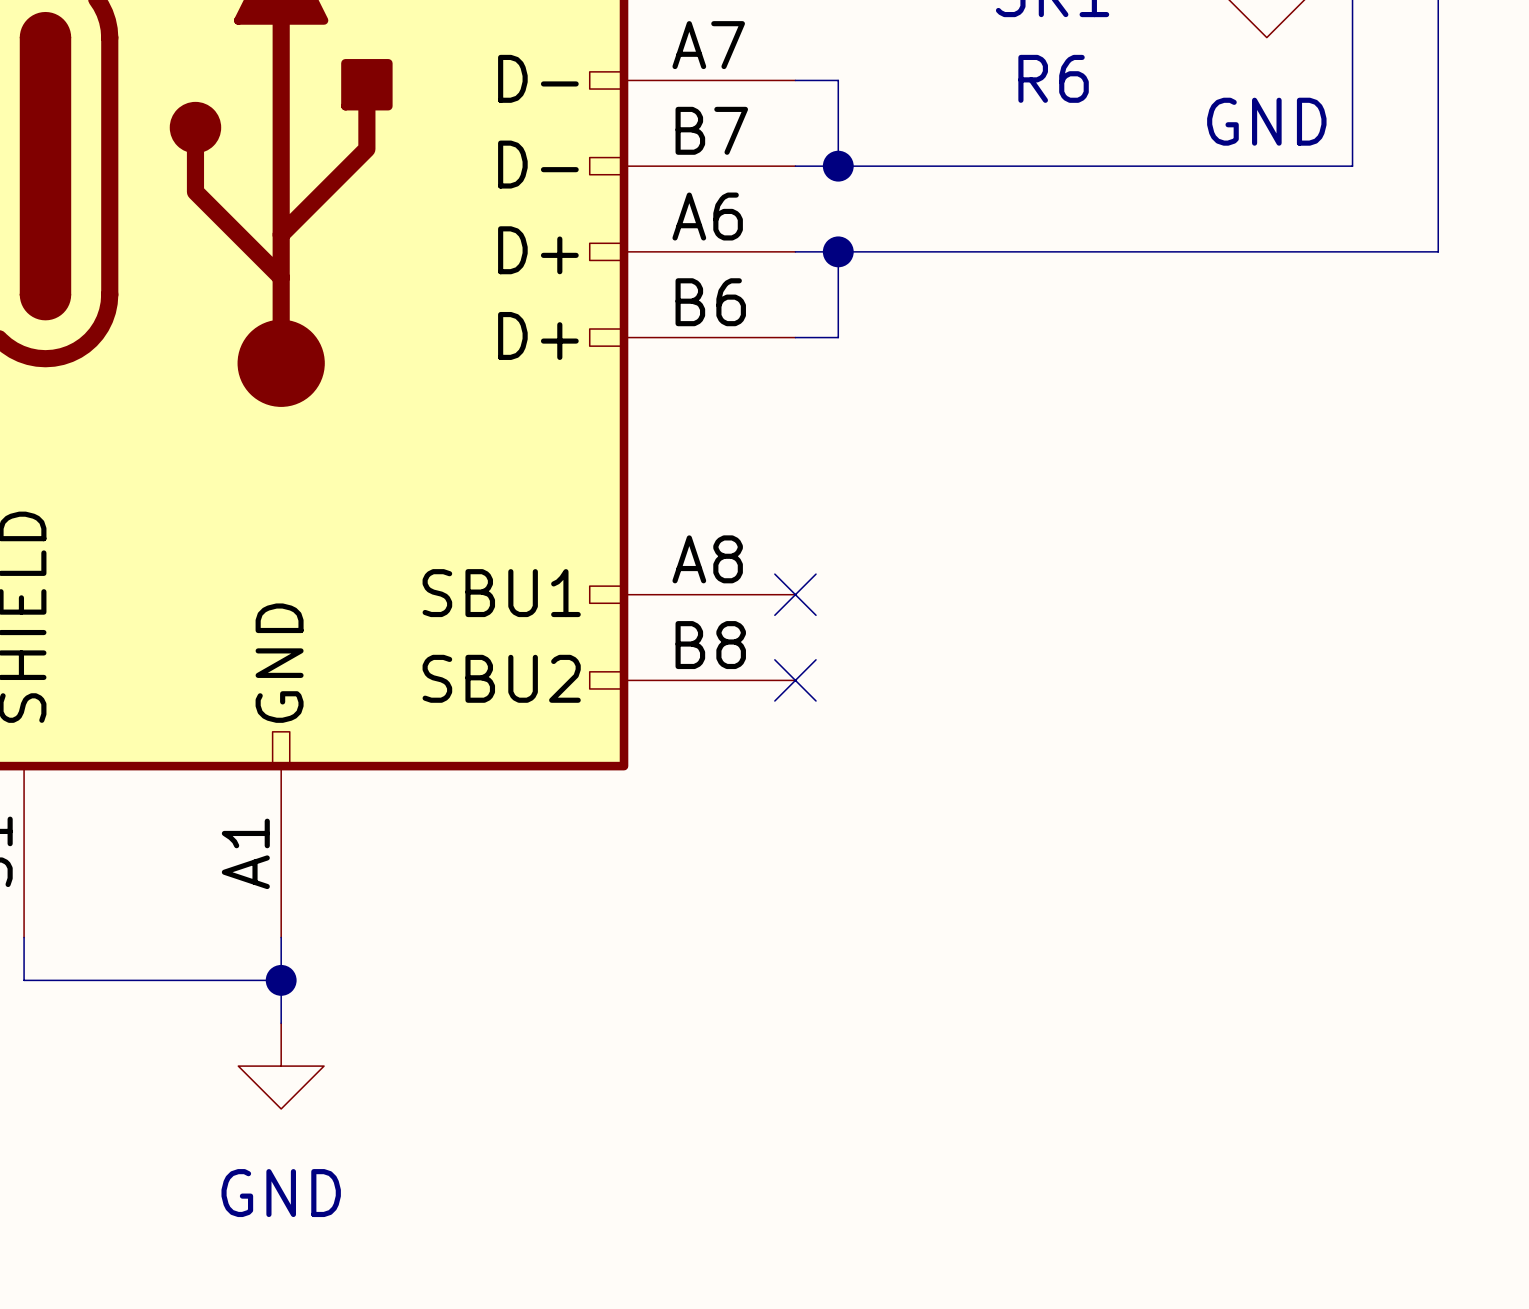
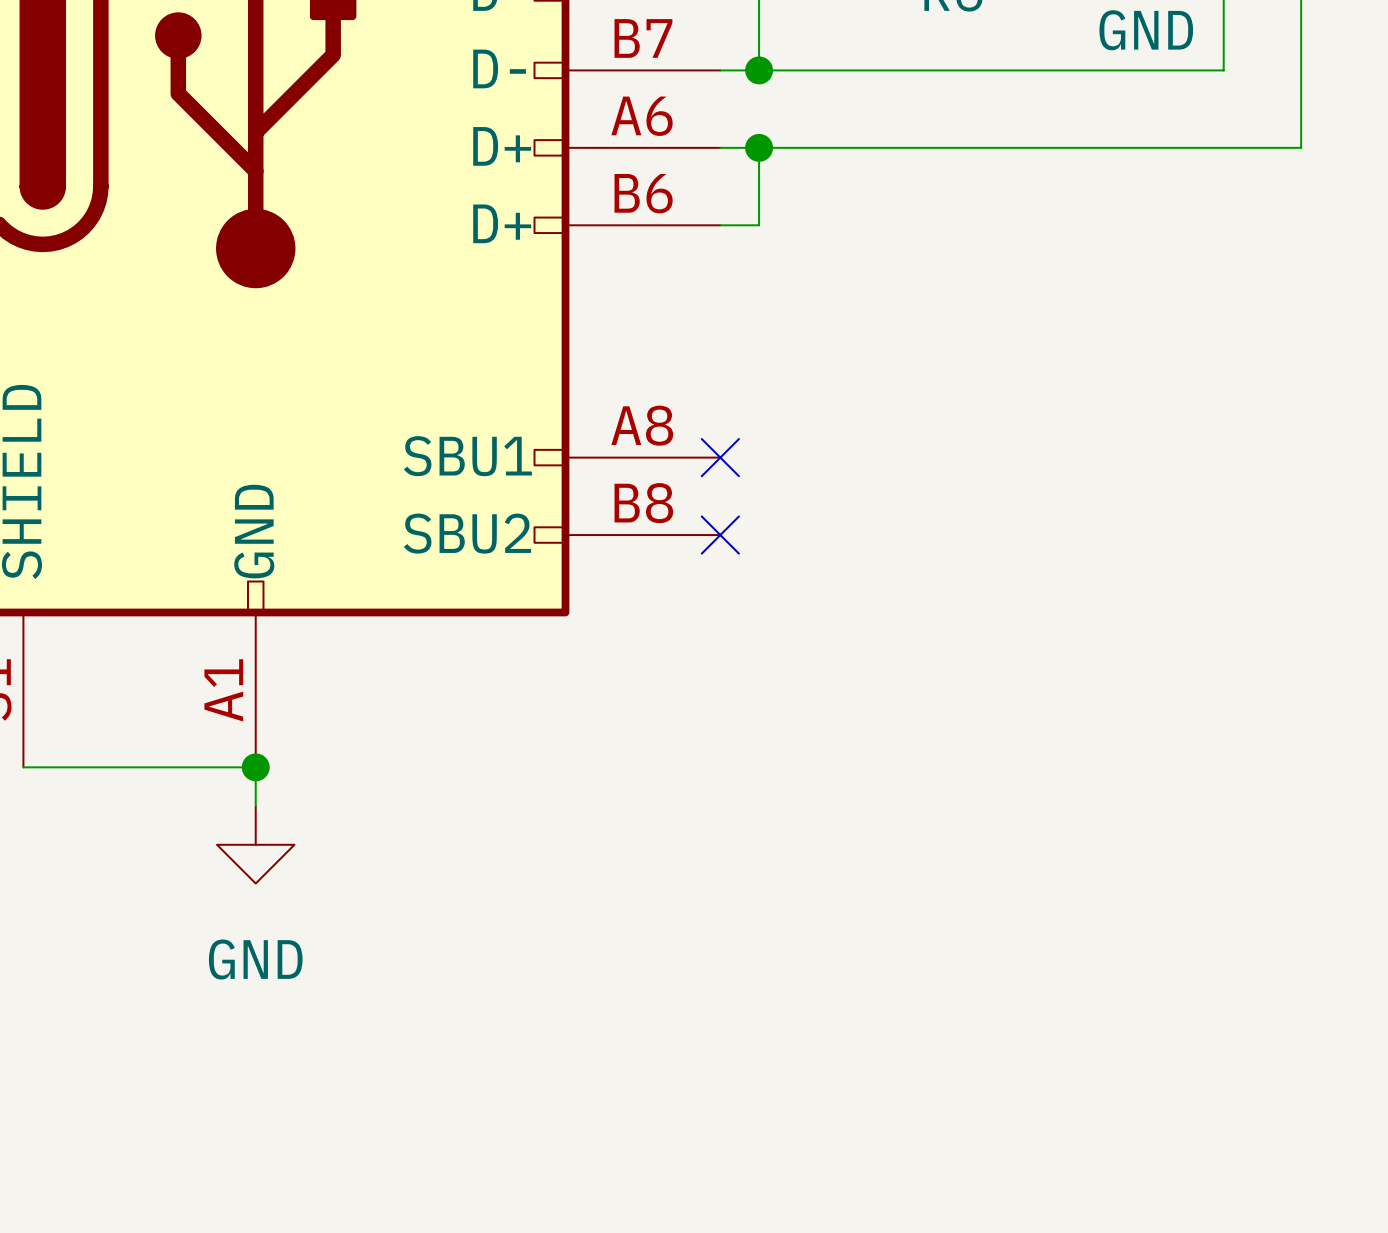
wire: (24, 937) (24, 980) (281, 980) (281, 1023) -> (23, 767) (255, 767)
junction position: (281, 980) -> (255, 767)
power symbol position: GND (281, 1066) -> GND (255, 844)

